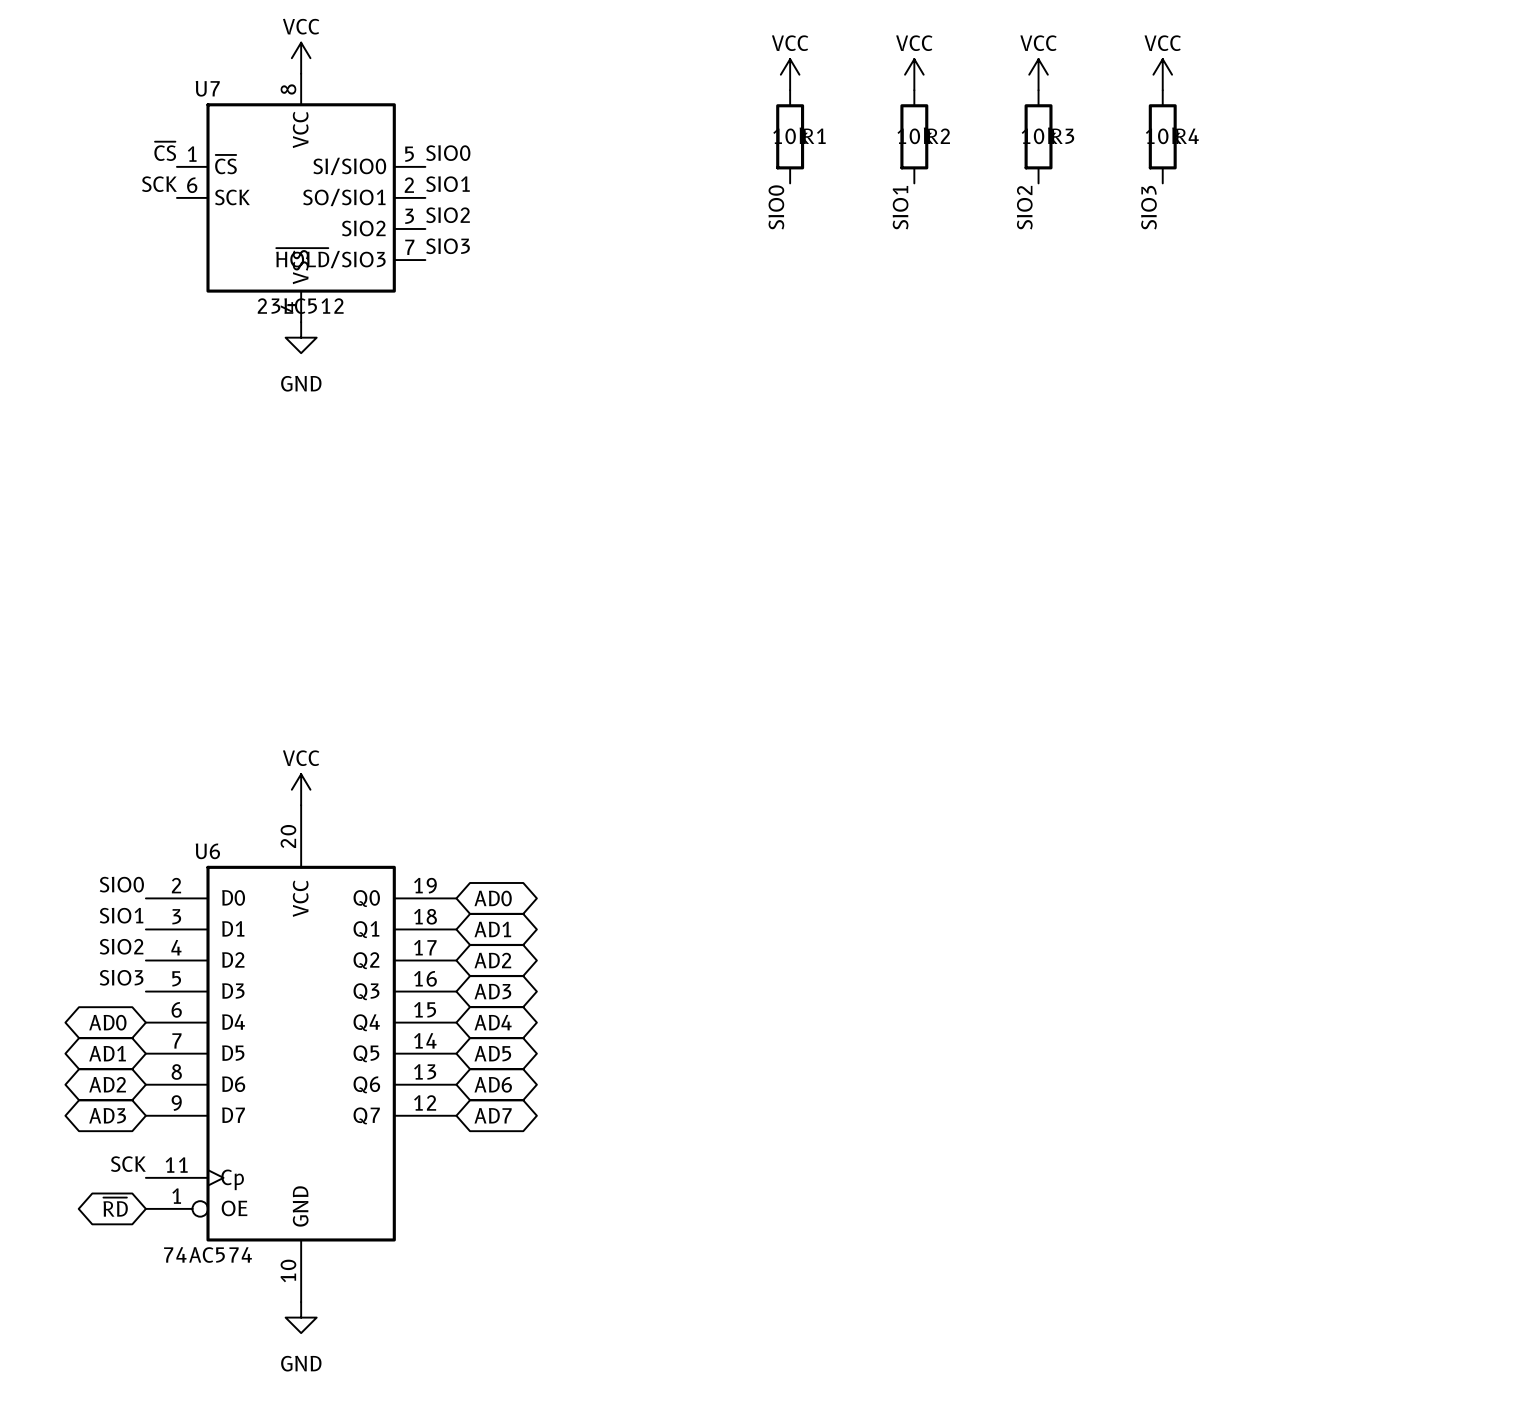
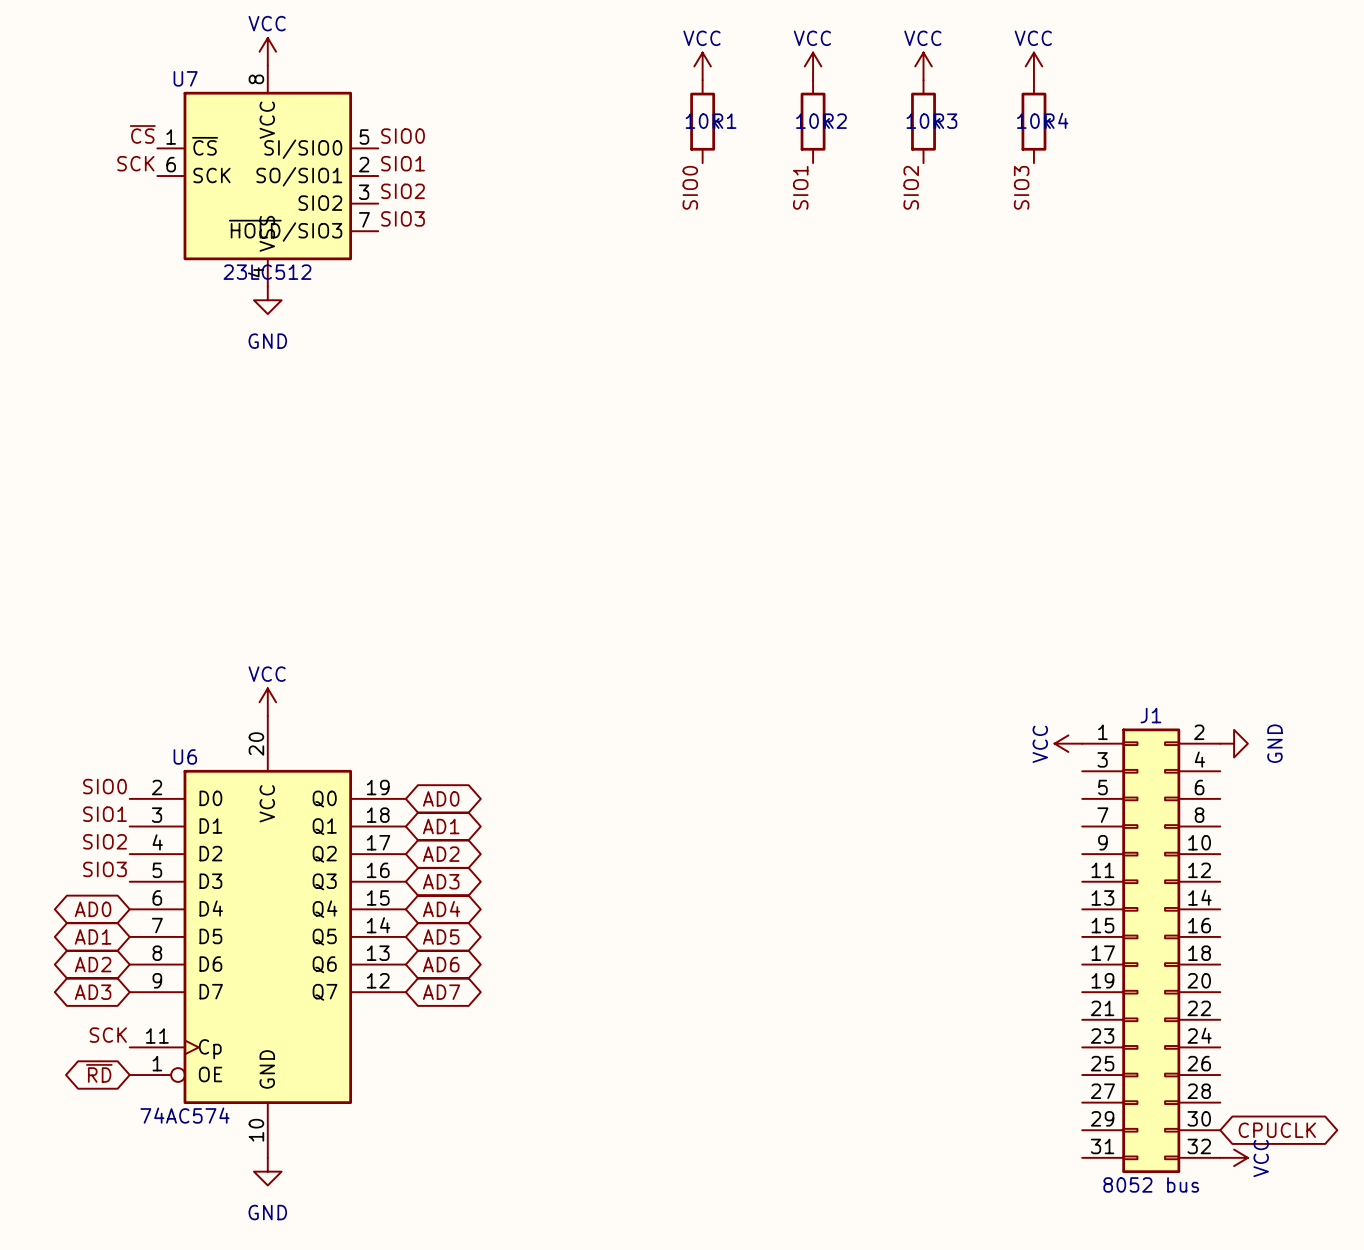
power symbol: none -> VCC (1068, 743)
power symbol: none -> GND (1234, 743)
J1: none -> 8052 bus (1151, 950)
global label: none -> CPUCLK (1277, 1130)
power symbol: none -> VCC (1234, 1157)

